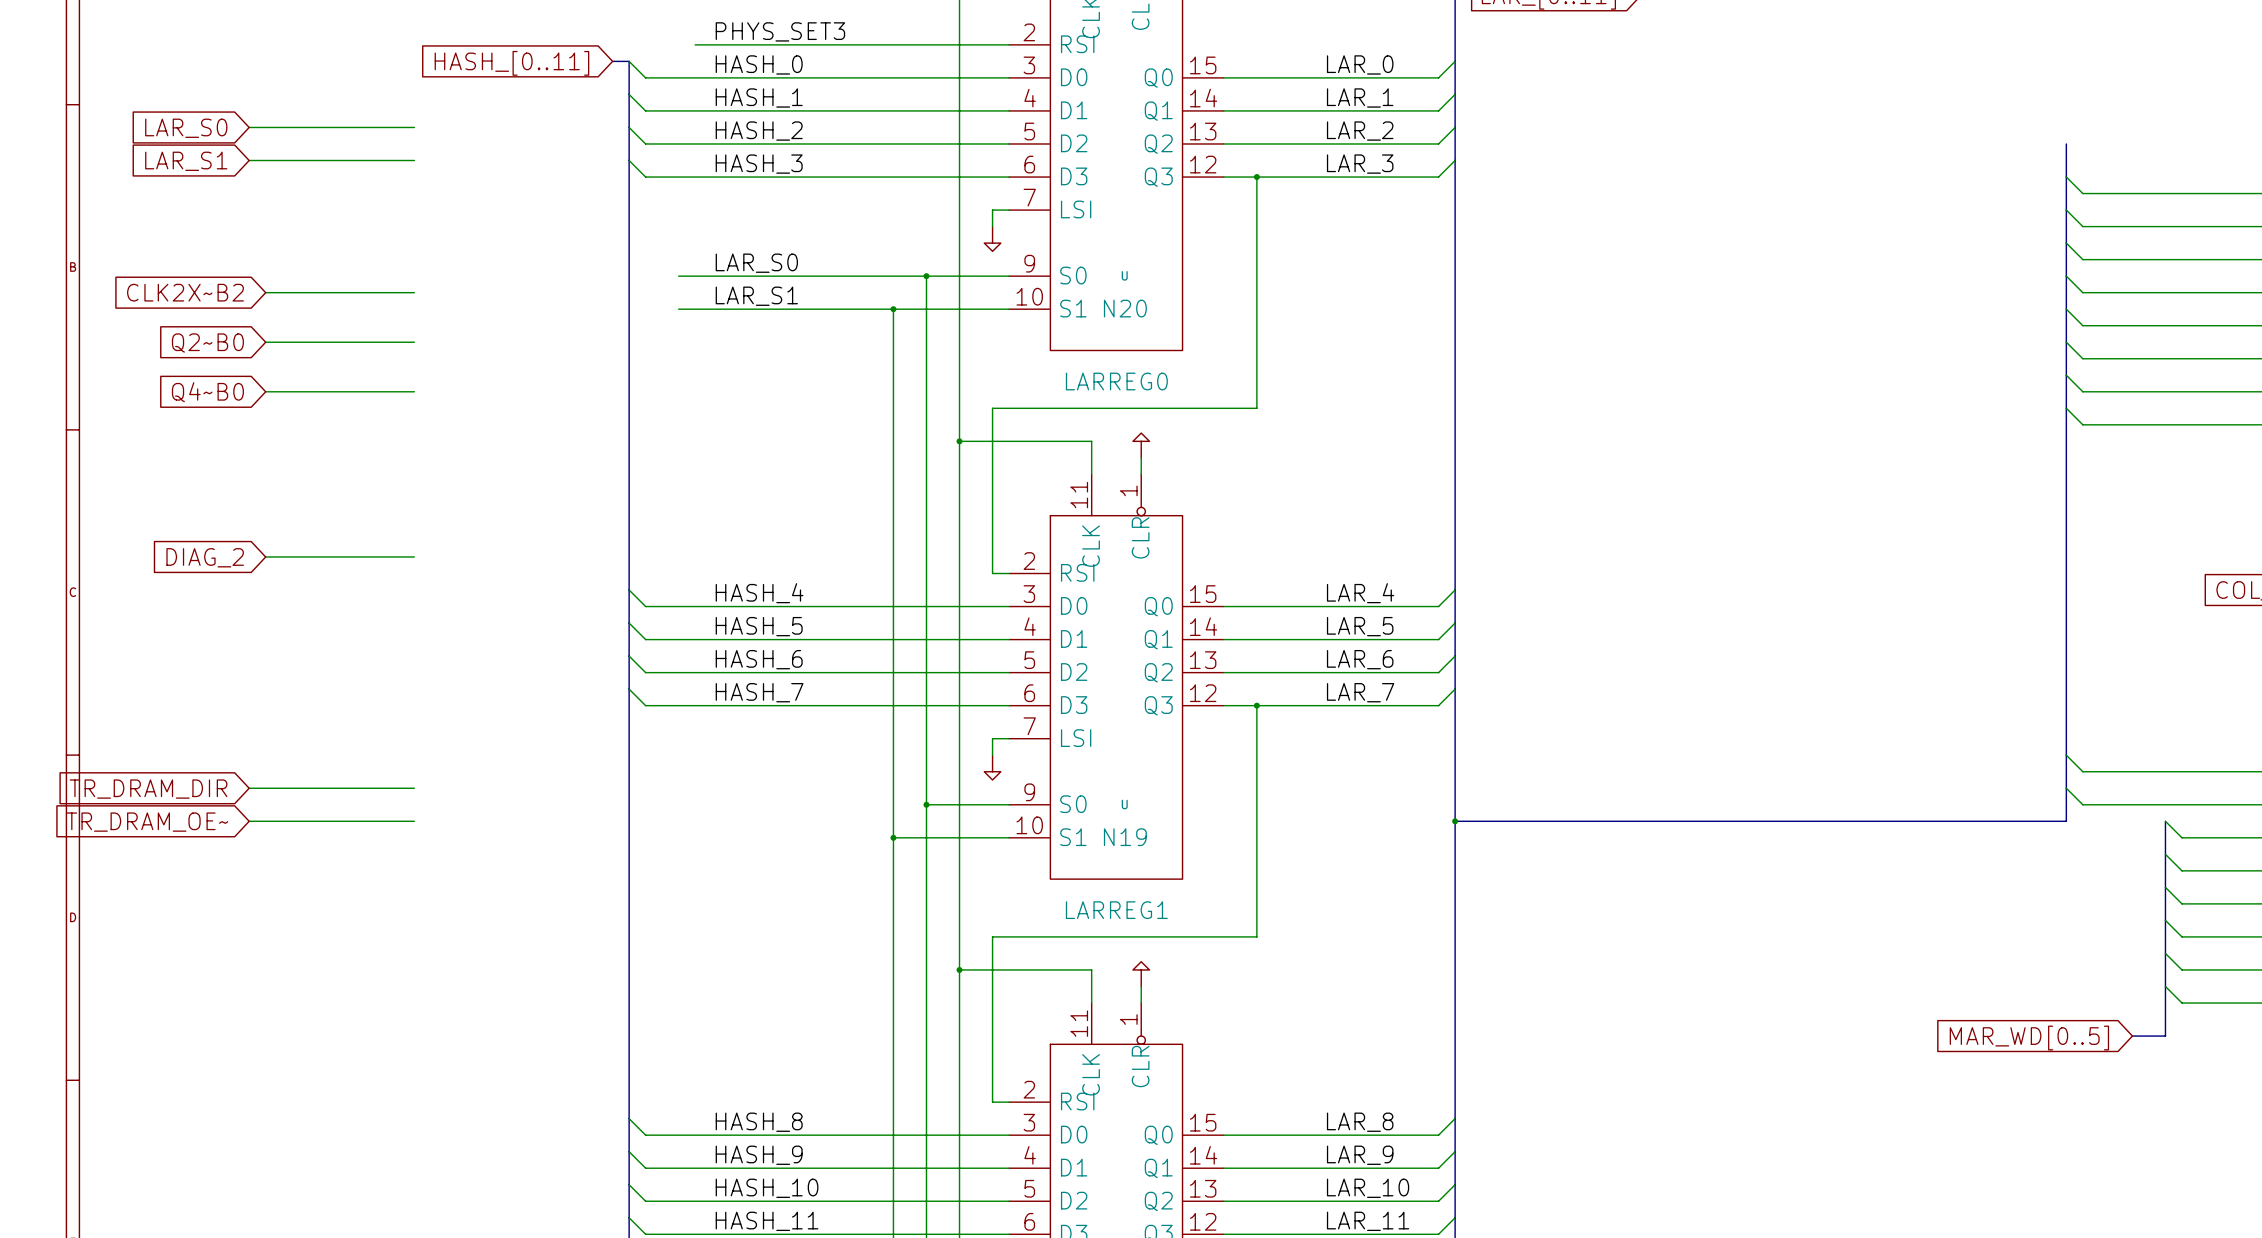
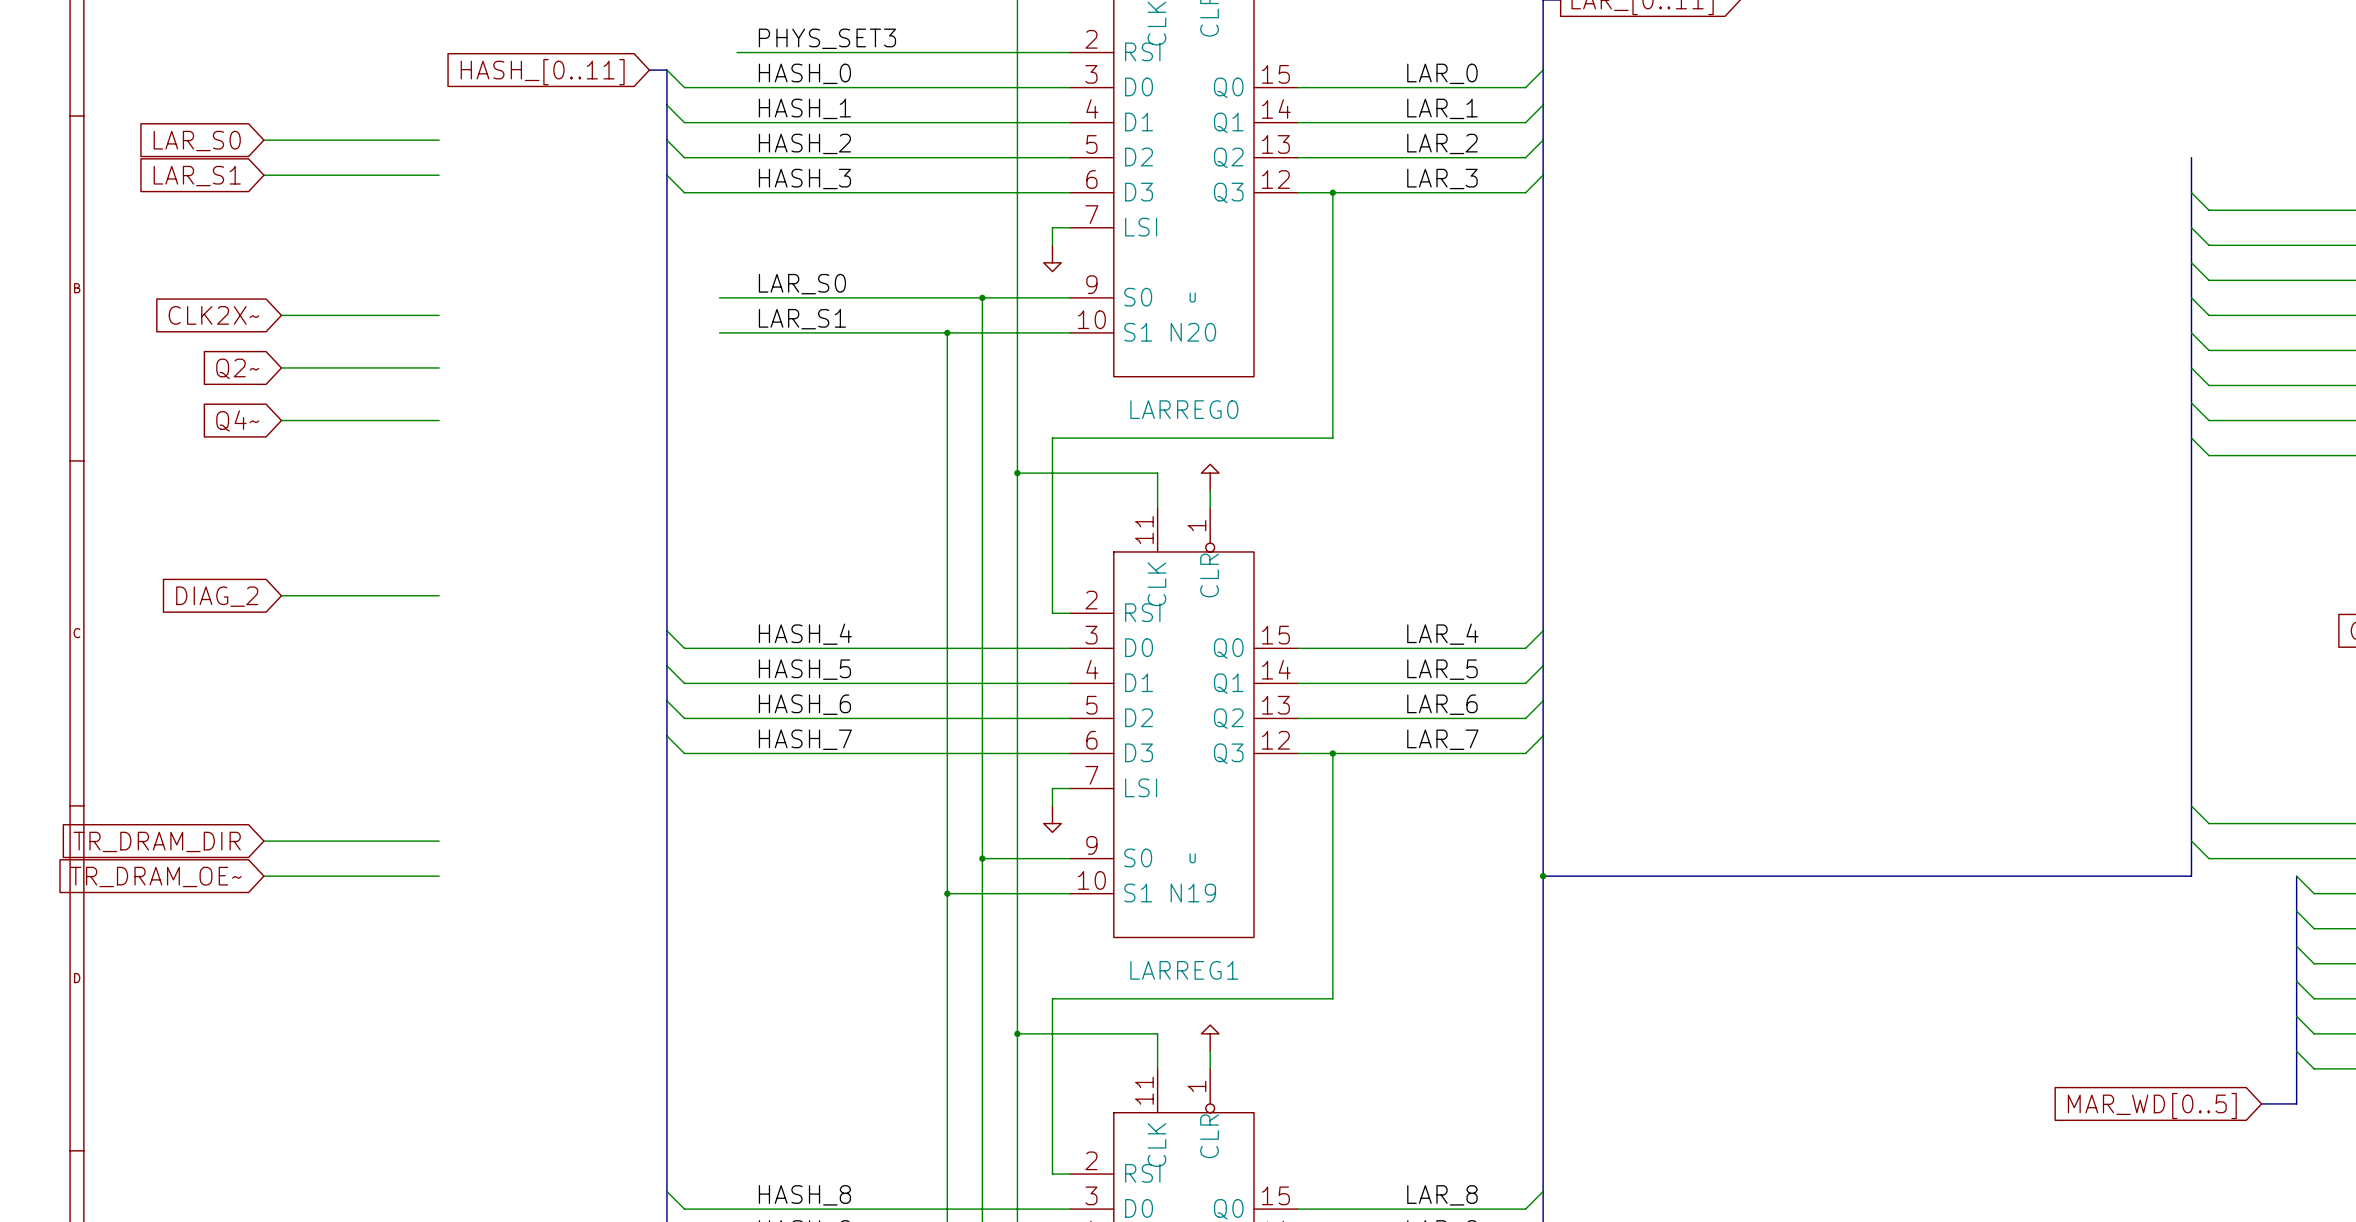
global label: CLK2X~B2 (185, 292) -> CLK2X~ (213, 315)
global label: Q2~B0 (207, 343) -> Q2~ (237, 368)
global label: Q4~B0 (207, 392) -> Q4~ (237, 420)

